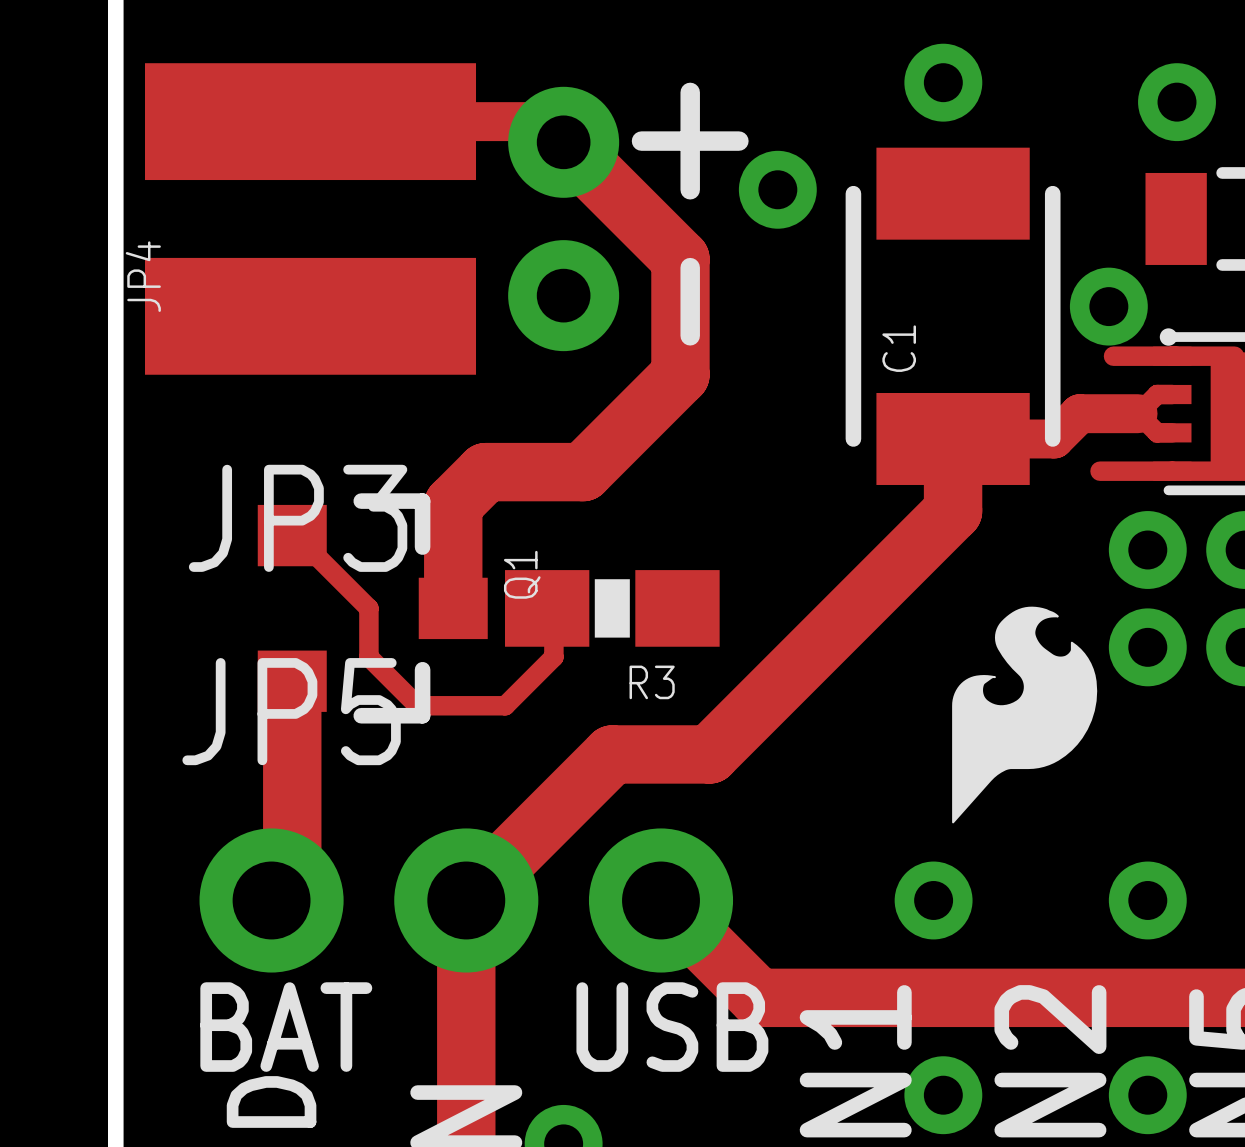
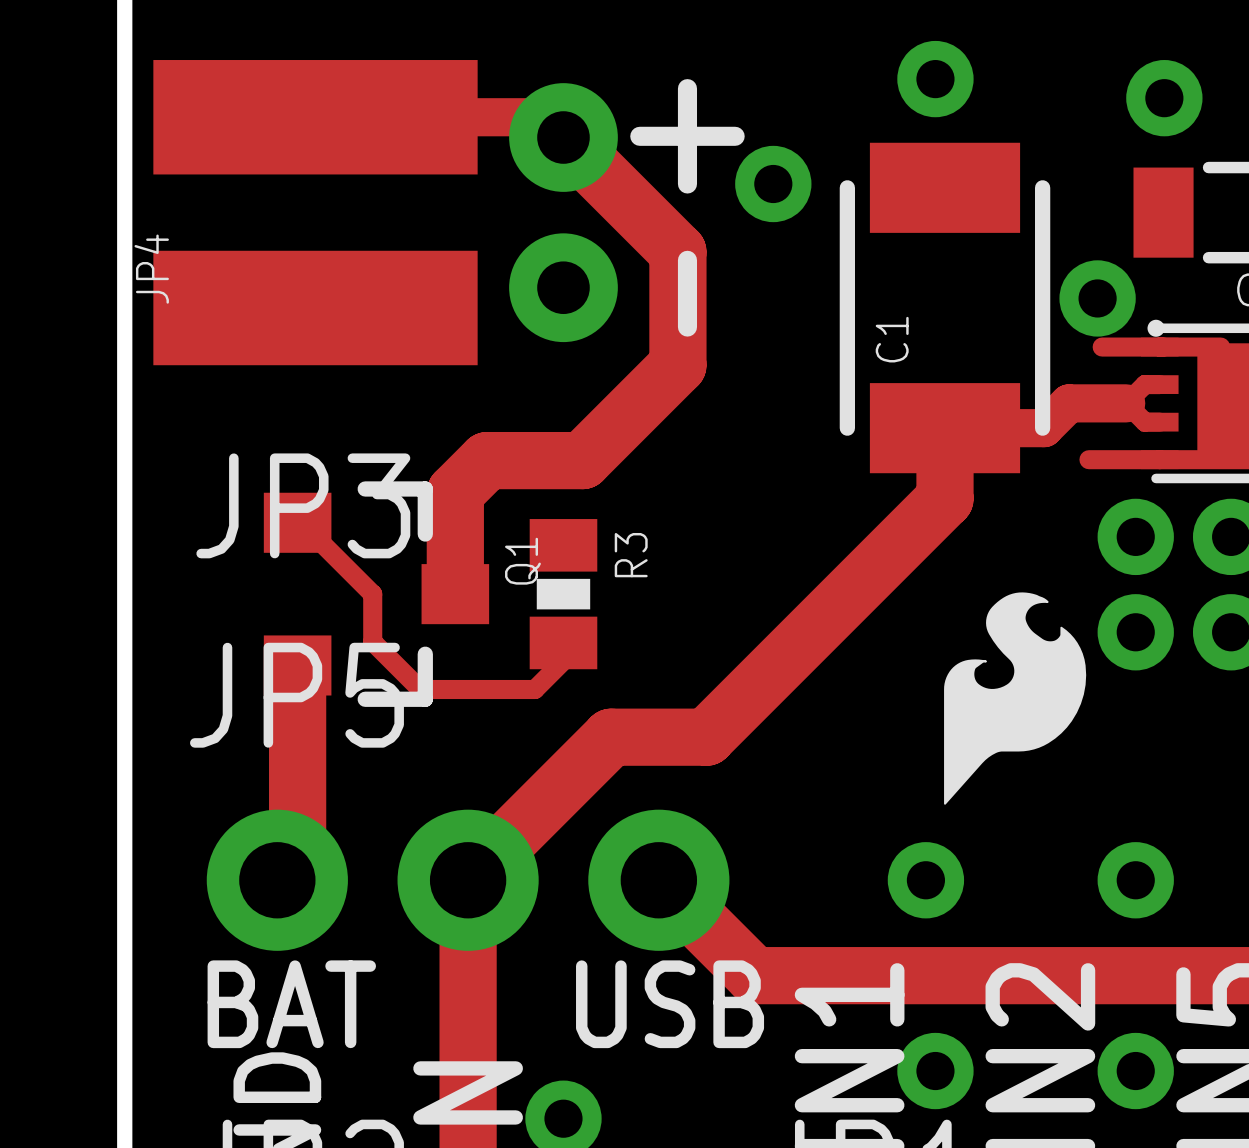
R3 footprint: [504, 570, 720, 647] -> [529, 519, 598, 670]
track: (547, 608) (553, 615) (553, 657) (505, 705) -> (563, 642) (563, 660) (534, 689) (506, 689)

